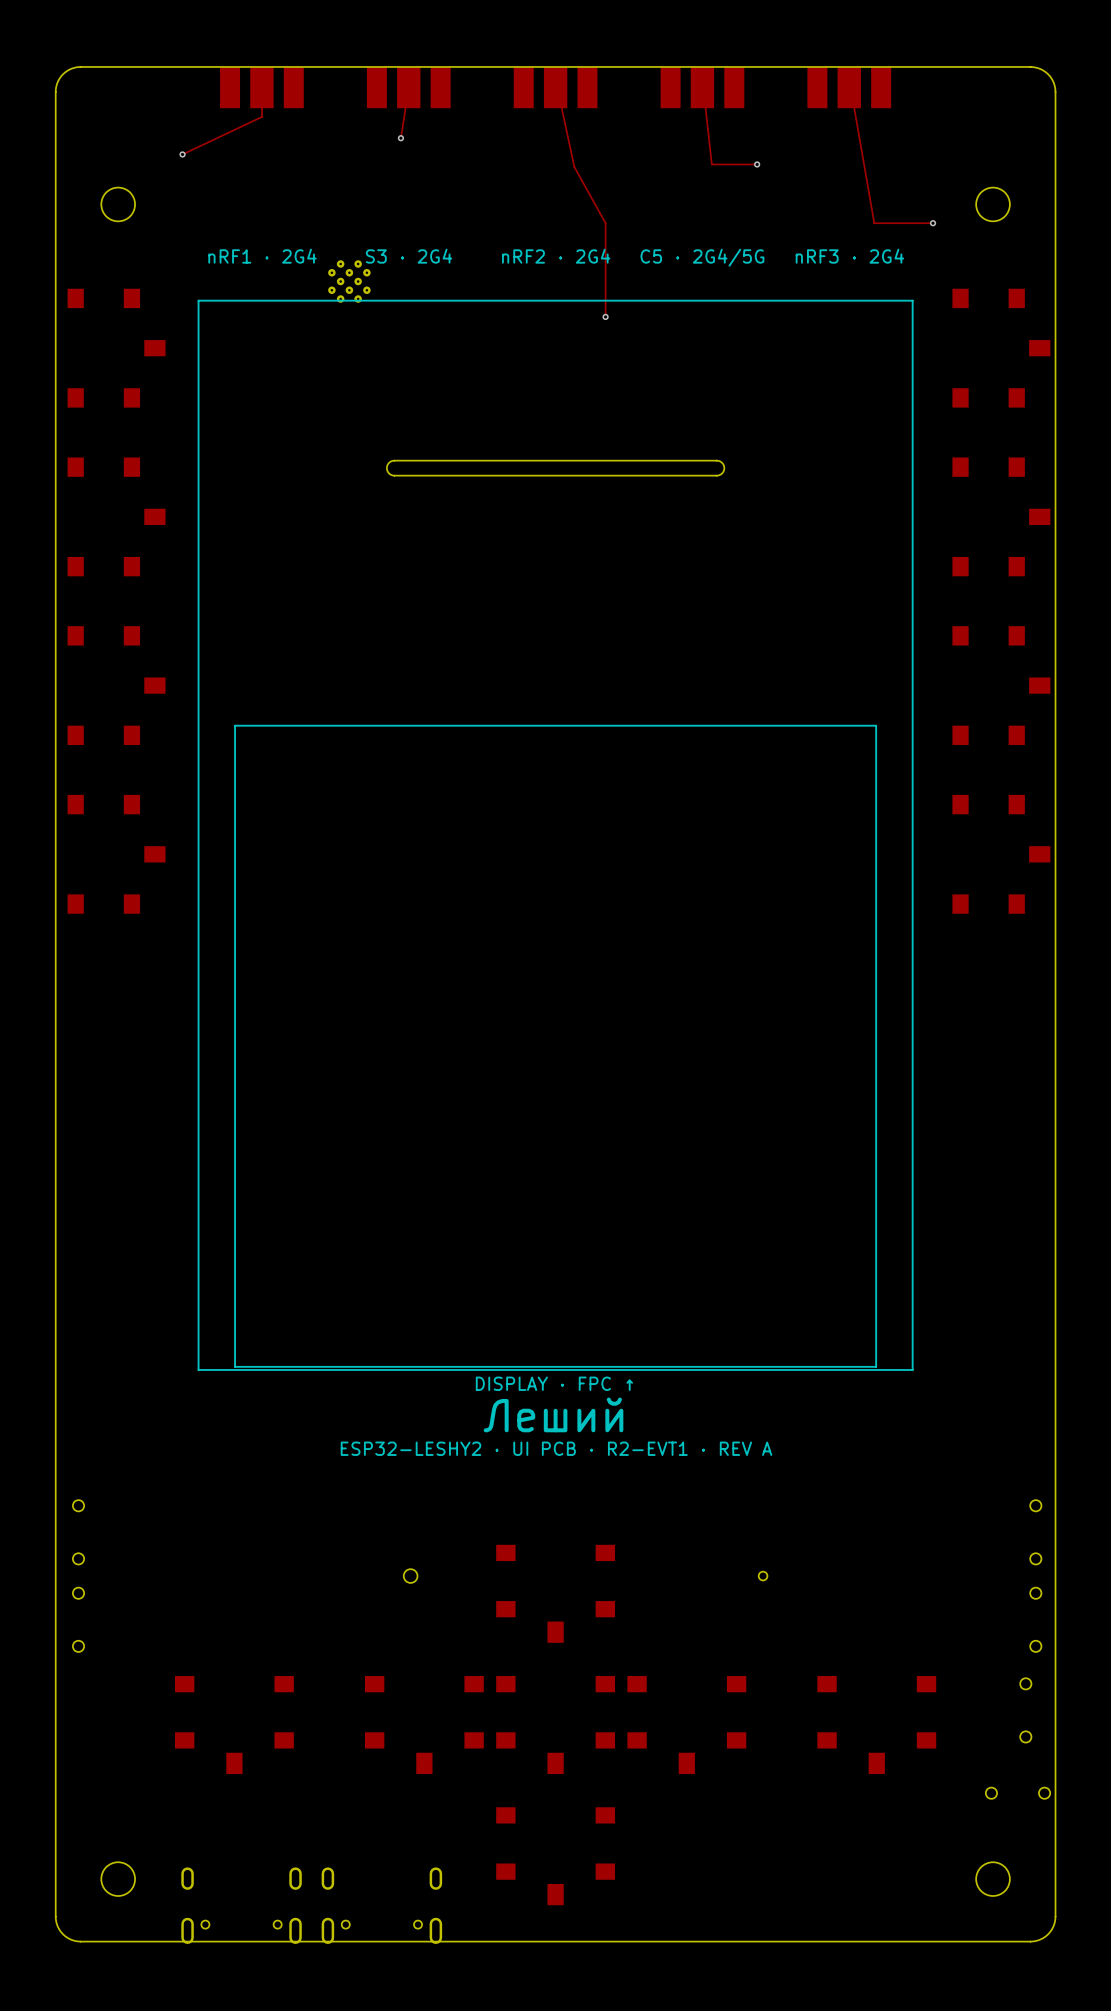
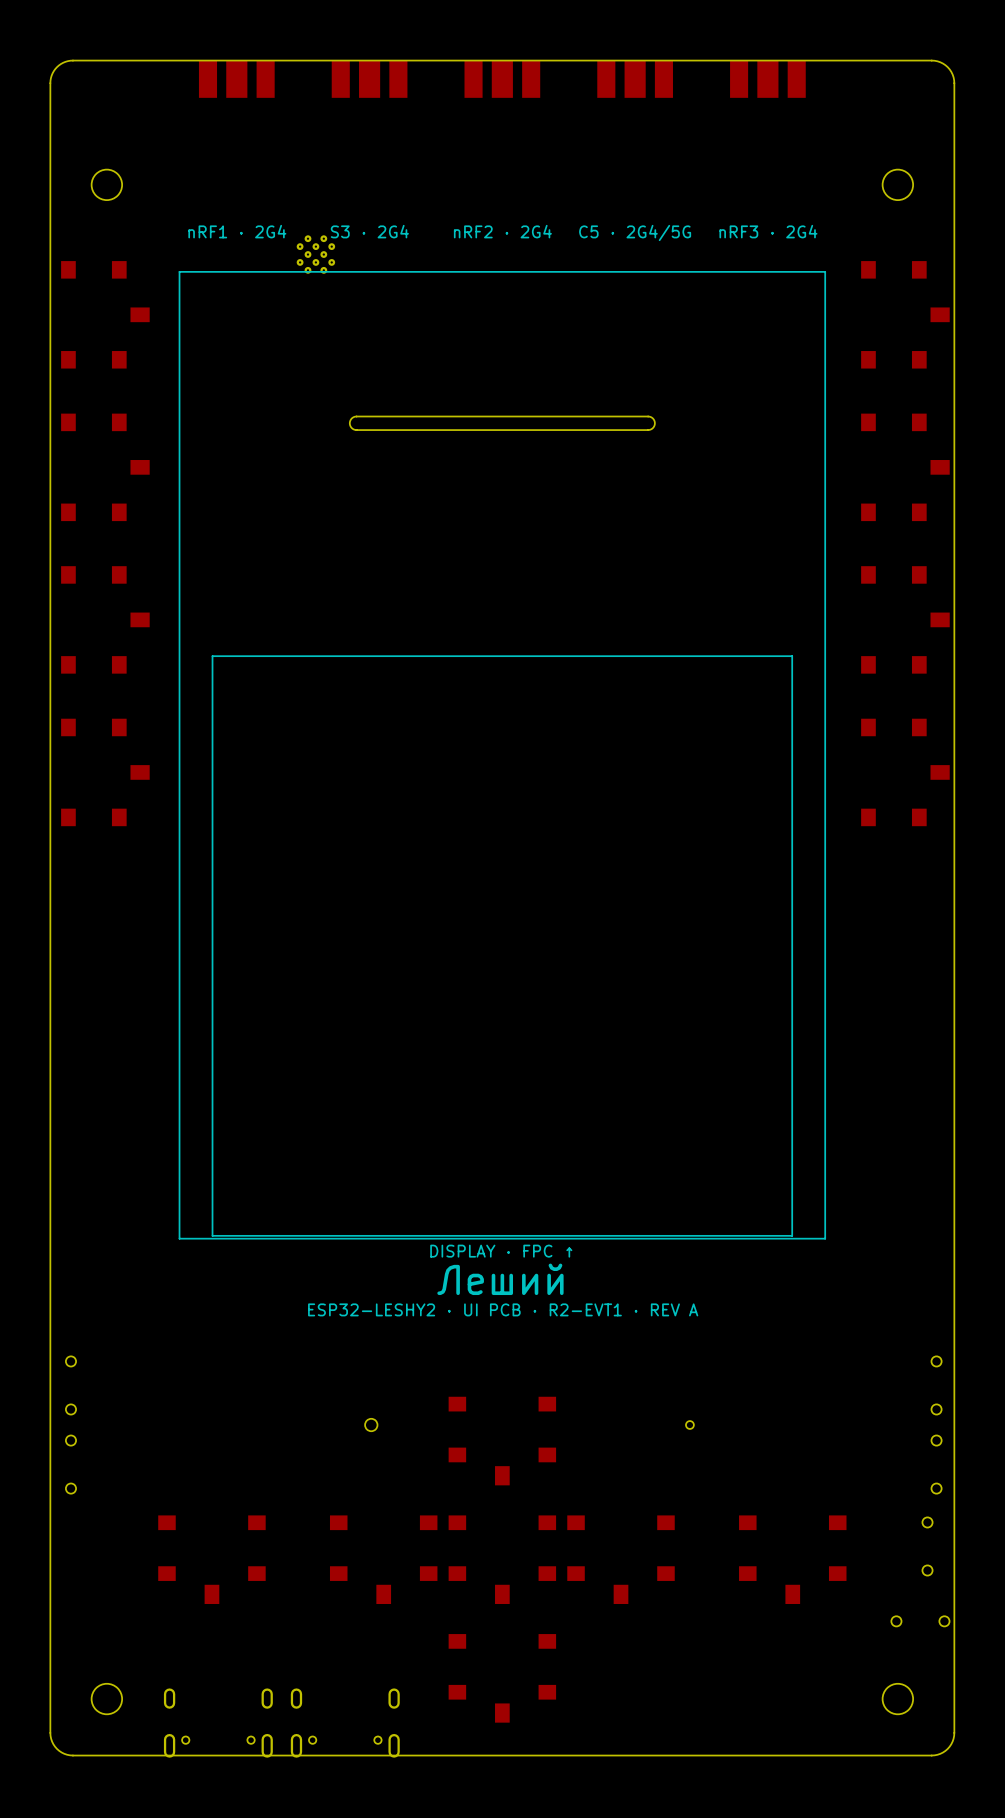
track: (261, 87) (261, 116) (182, 154) -> none
track: (408, 87) (400, 138) -> none
track: (555, 87) (555, 79) (574, 166) (605, 223) (605, 316) -> none
track: (702, 87) (702, 79) (711, 164) (757, 164) -> none
track: (849, 87) (849, 79) (874, 223) (933, 223) -> none
via: (400, 138) -> none
via: (182, 154) -> none
via: (757, 164) -> none
via: (933, 223) -> none
via: (605, 316) -> none

